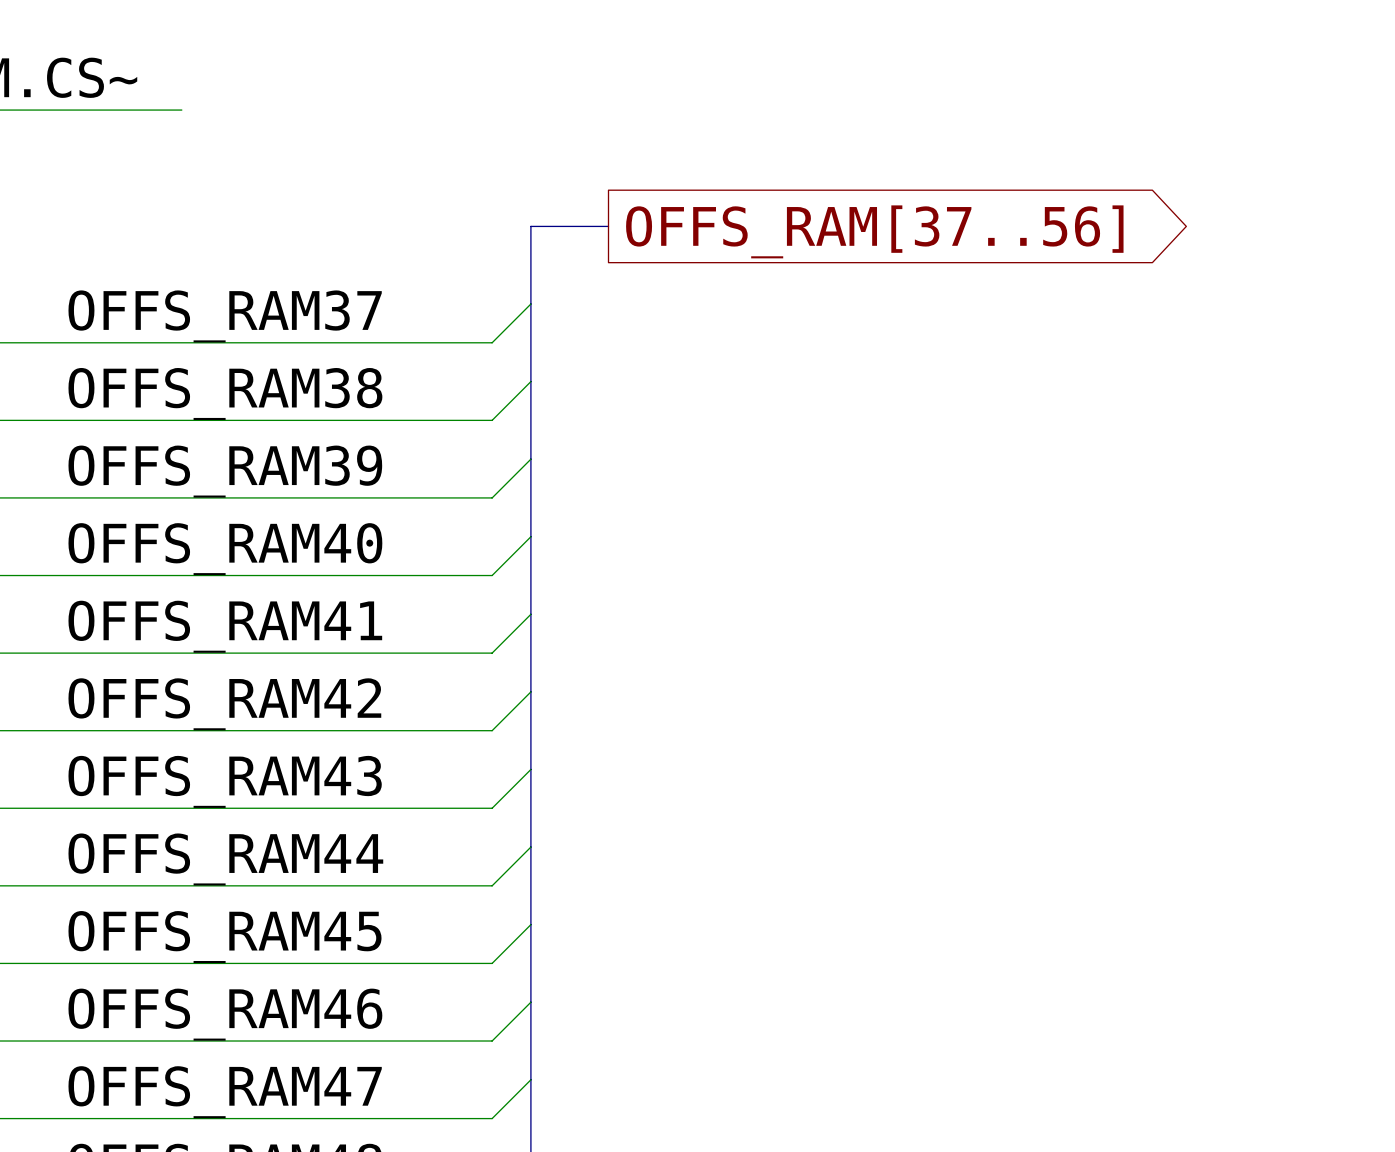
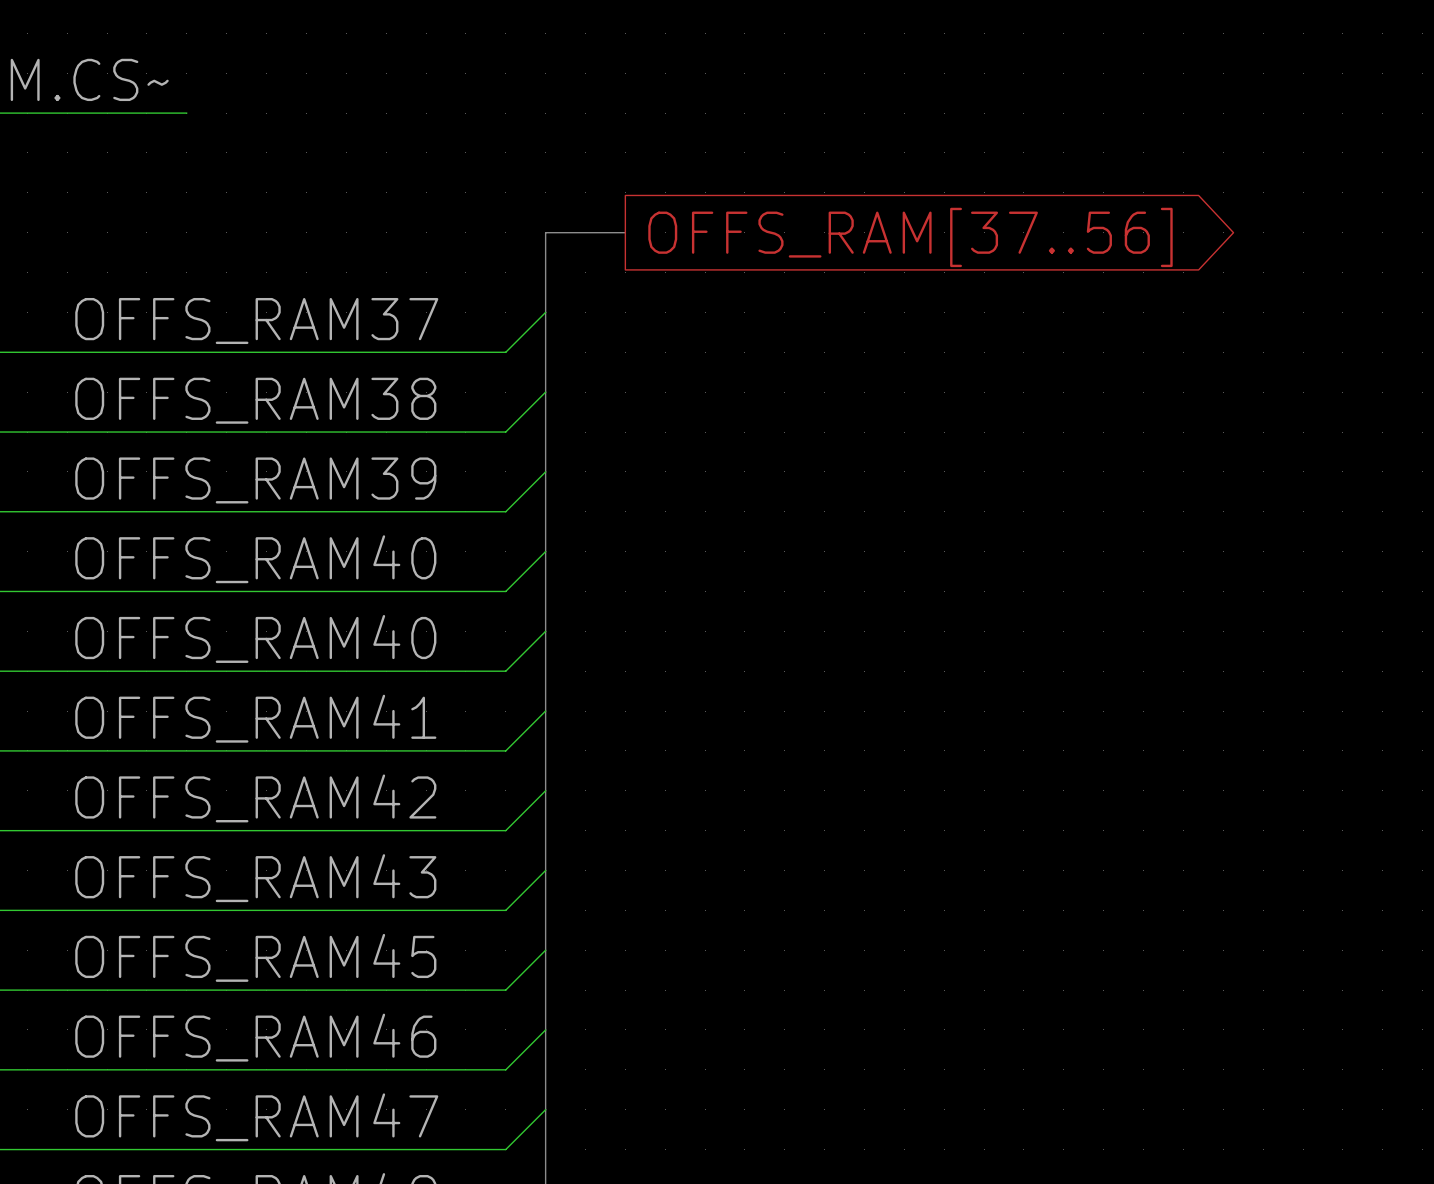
label: OFFS_RAM41 (225, 626) -> OFFS_RAM40 (255, 638)
label: OFFS_RAM42 (224, 704) -> OFFS_RAM41 (255, 718)
label: OFFS_RAM43 (225, 781) -> OFFS_RAM42 (255, 798)
label: OFFS_RAM44 (225, 859) -> OFFS_RAM43 (255, 878)

